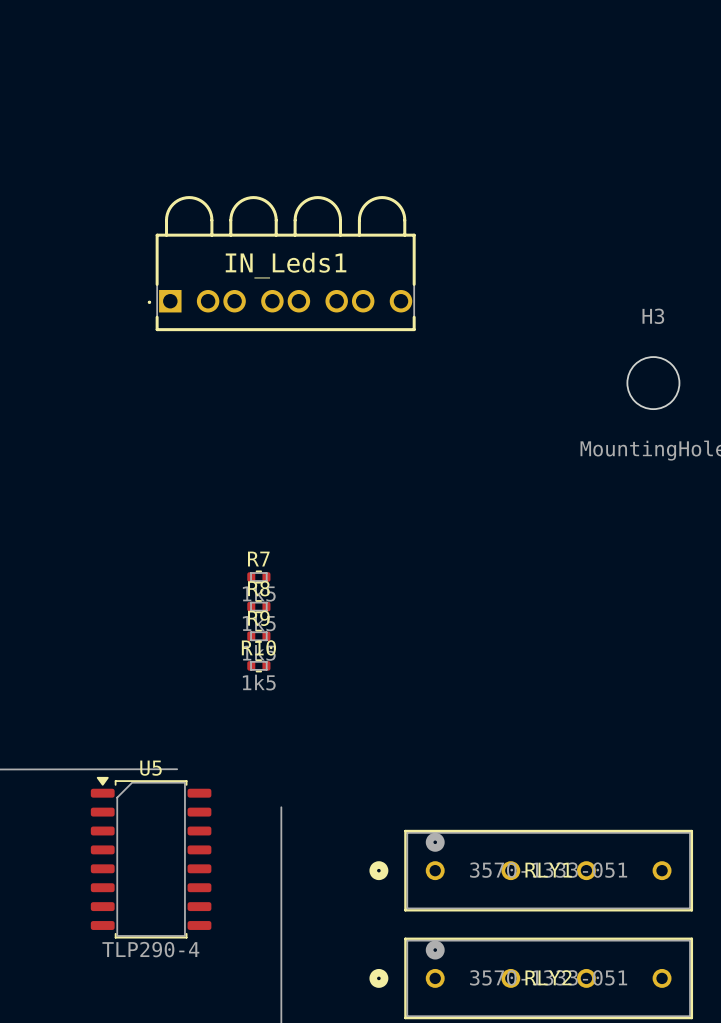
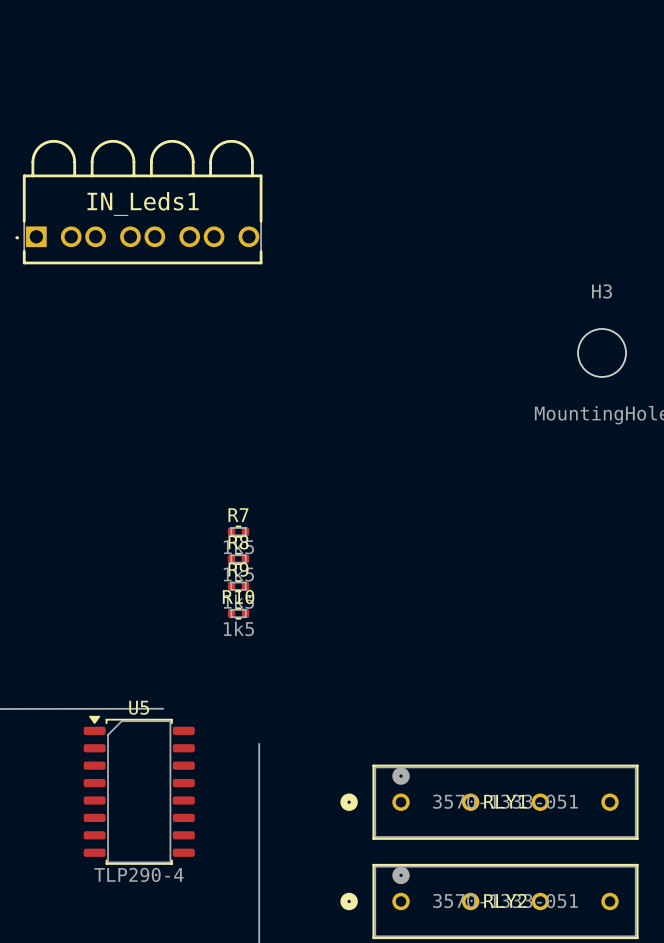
IN_Leds1 position: (281, 263) -> (139, 202)

